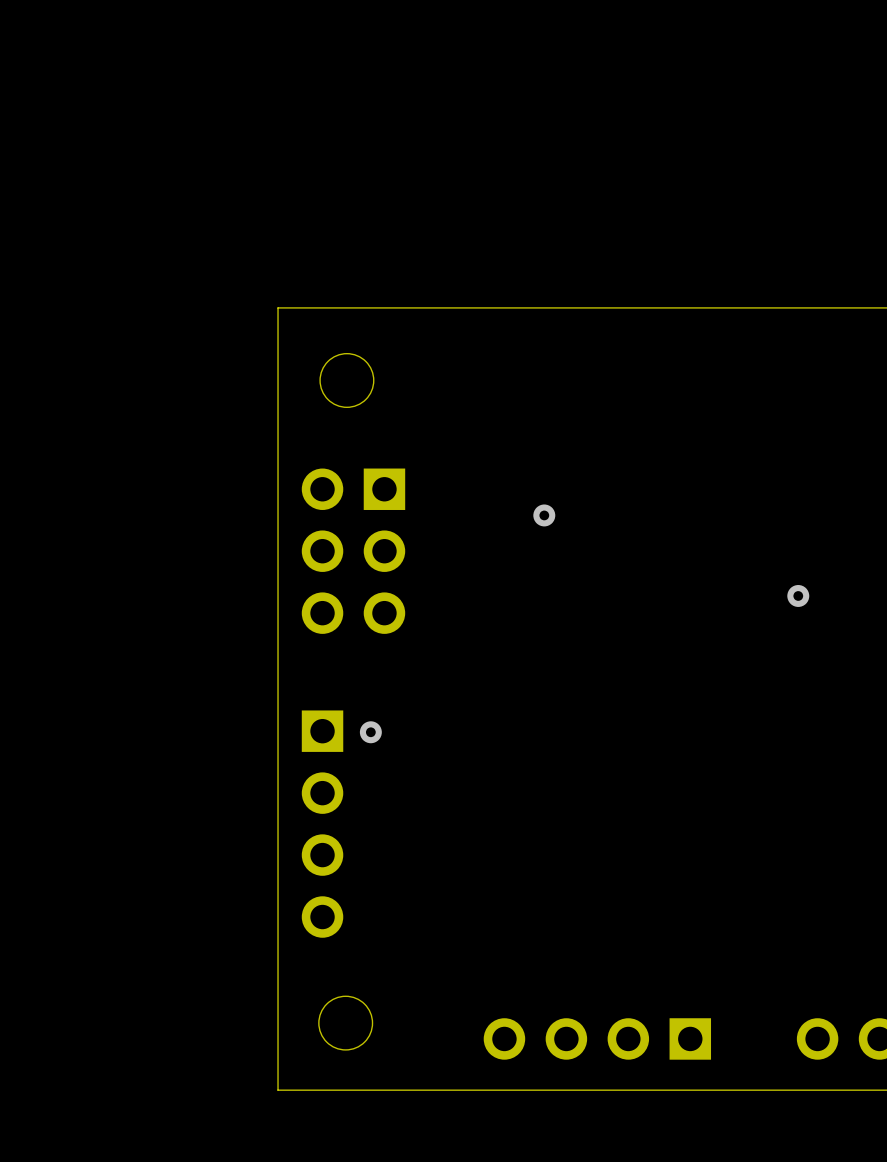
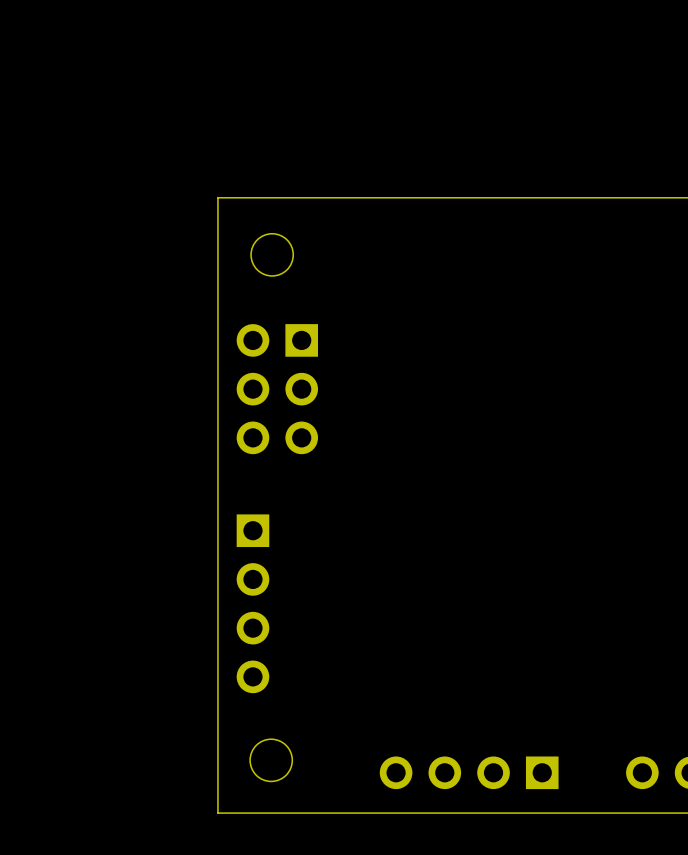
via: (544, 515) -> none
via: (798, 595) -> none
via: (370, 732) -> none

